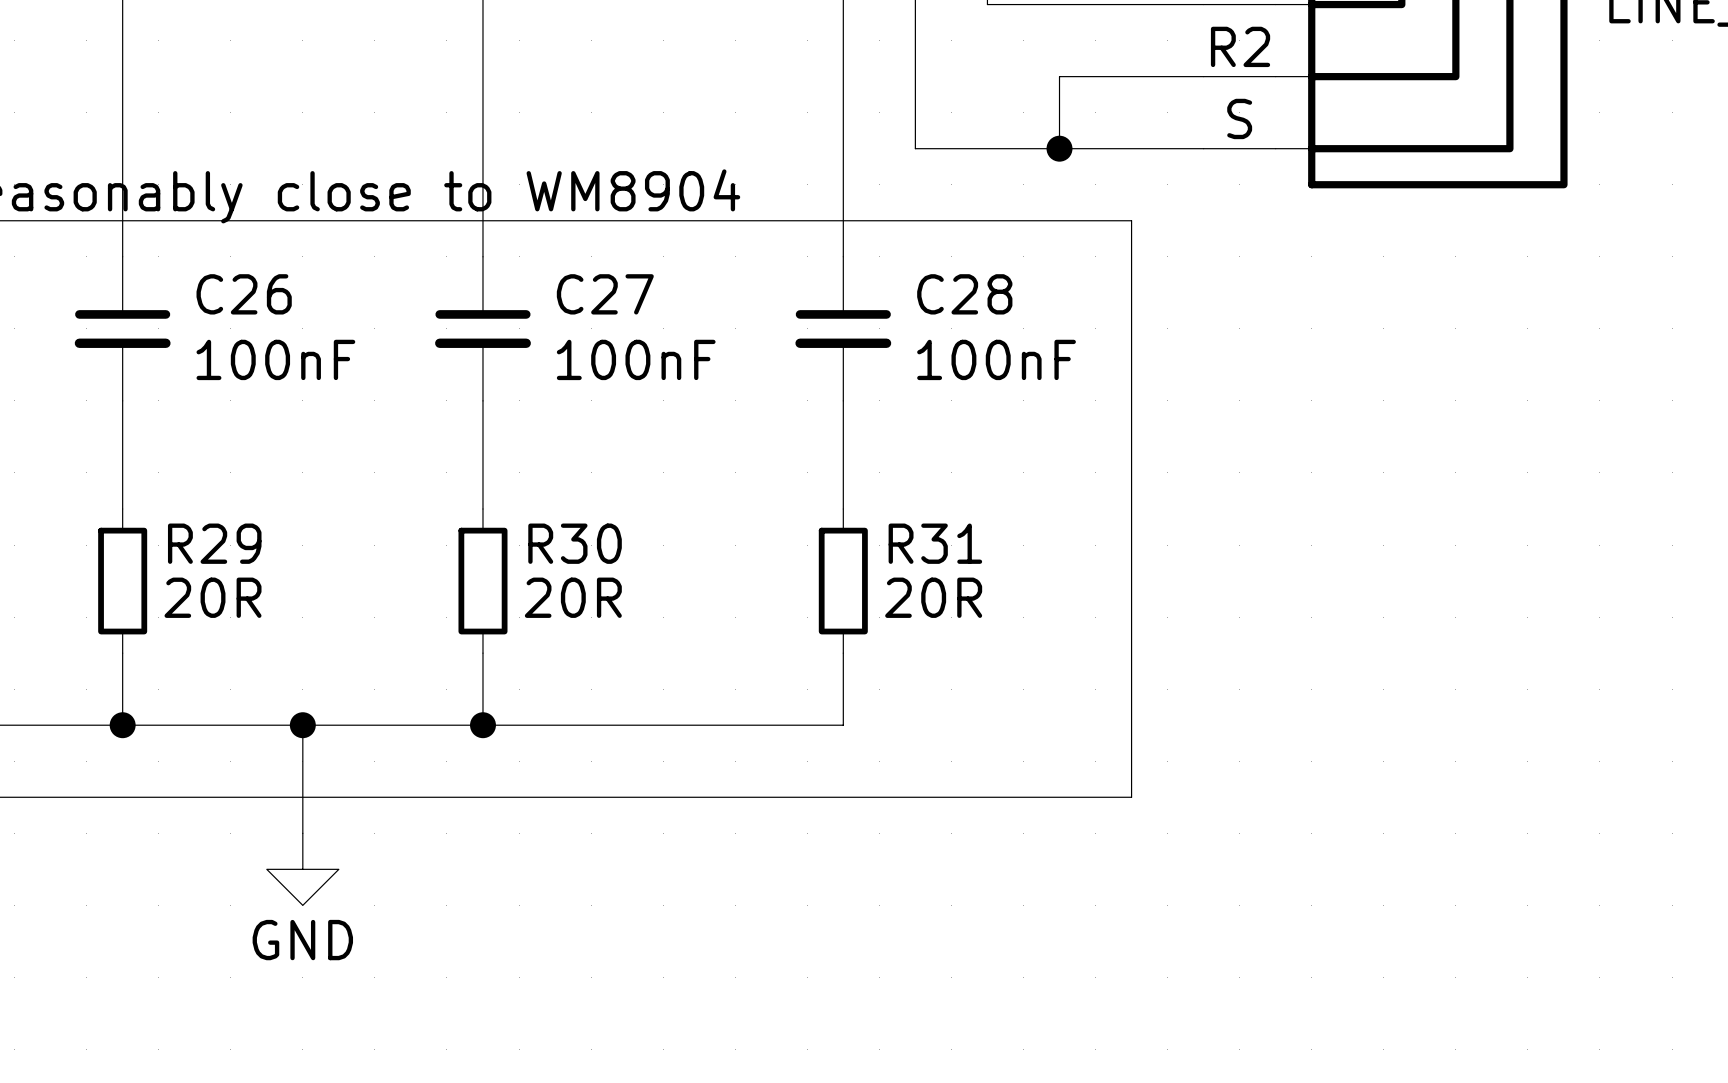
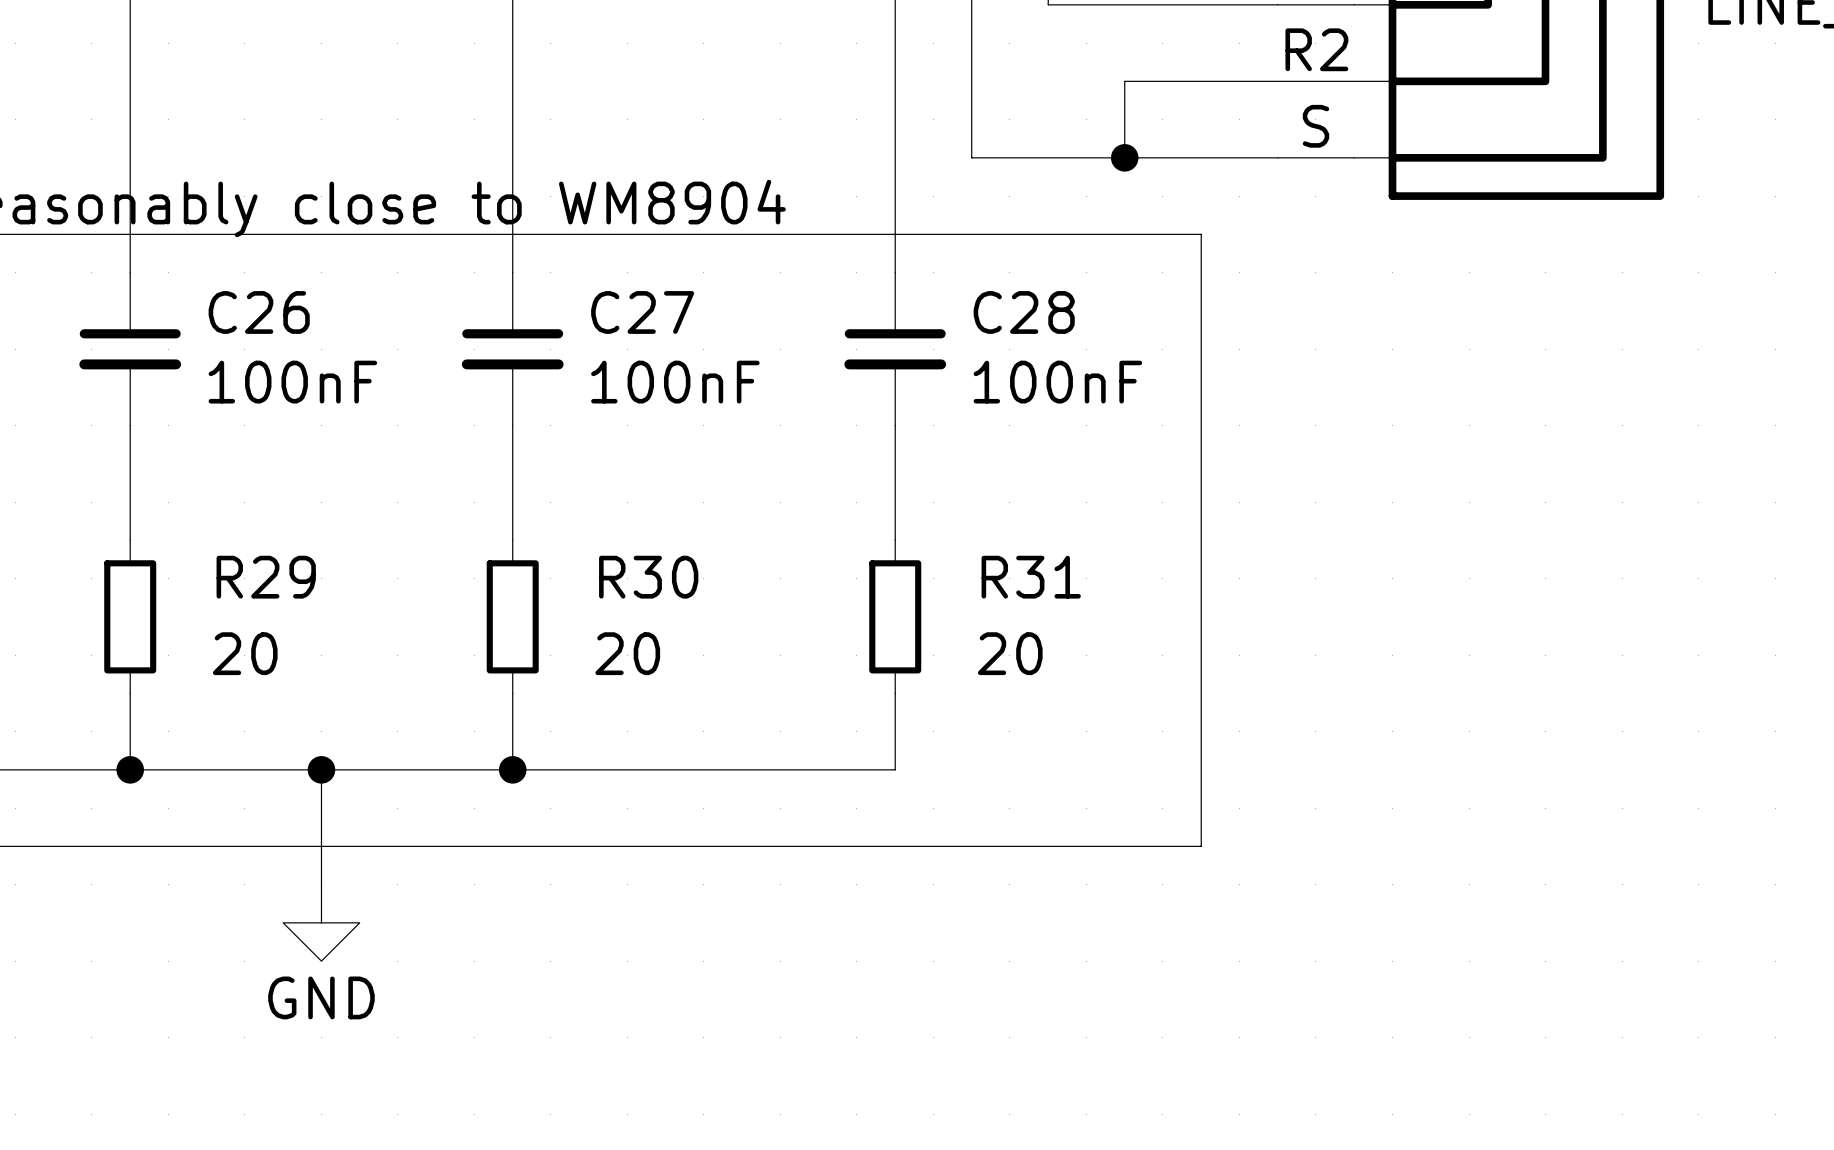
R29 name position: R29 (214, 543) -> R29 (266, 577)
R30 name position: R30 (575, 543) -> R30 (648, 577)
R31 name position: R31 (935, 543) -> R31 (1031, 577)
R29 value: 20R (213, 597) -> 20 (245, 653)
R30 value: 20R (573, 597) -> 20 (627, 653)
R31 value: 20R (933, 597) -> 20 (1010, 653)

